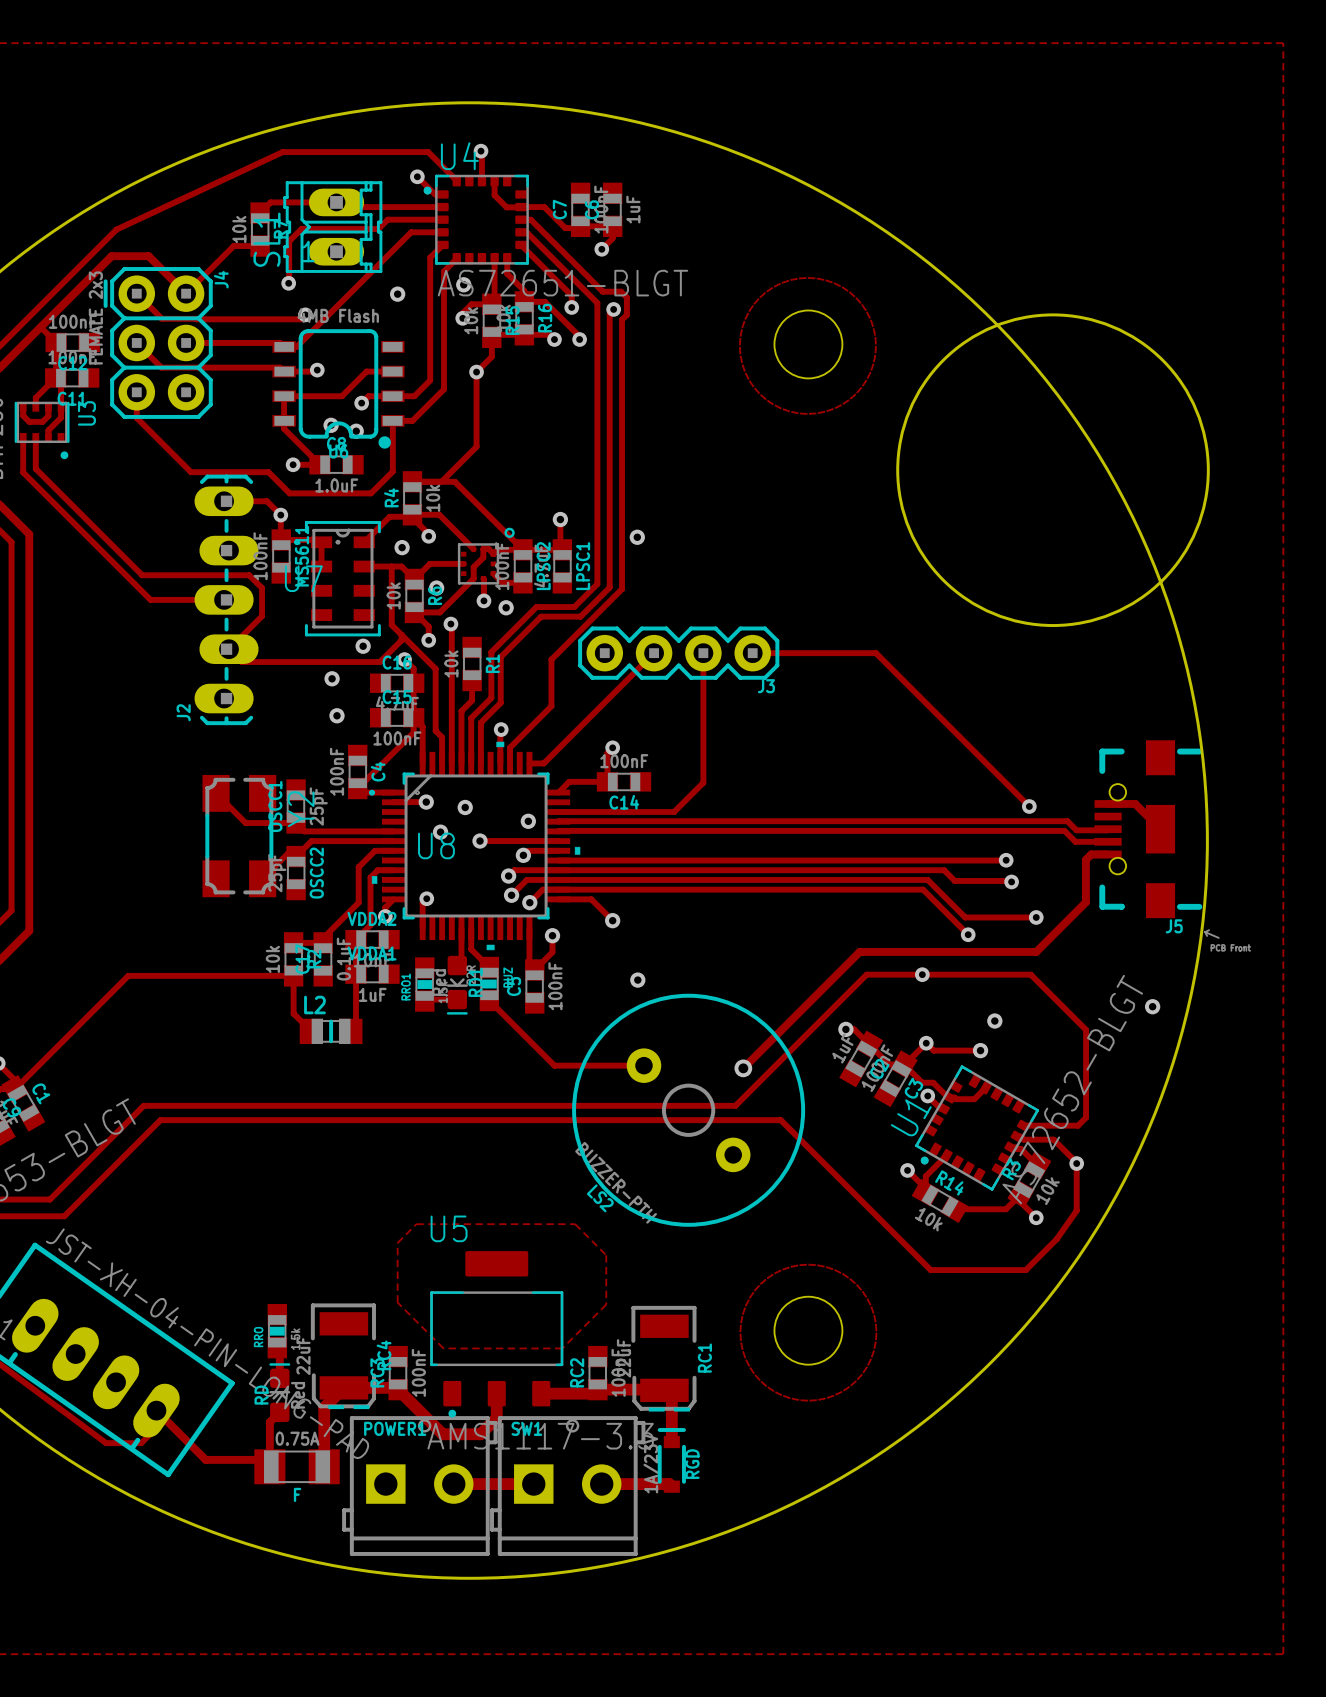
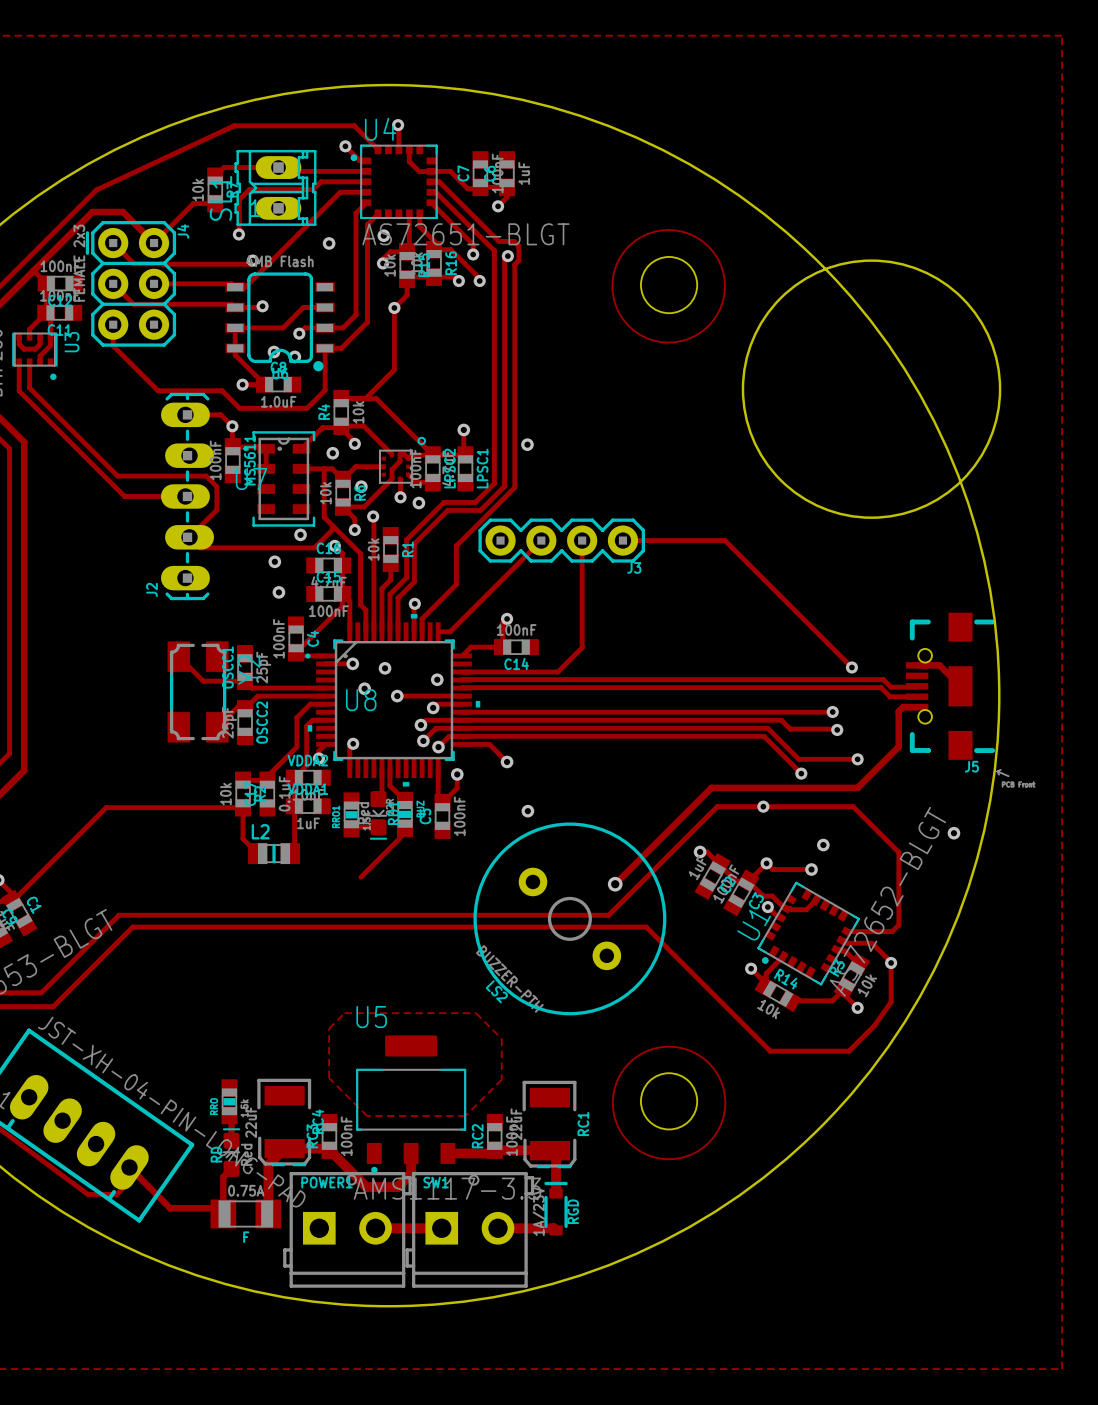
track: (489, 1000) (554, 1065) (643, 1065) -> (405, 828) (405, 833) (360, 877)

